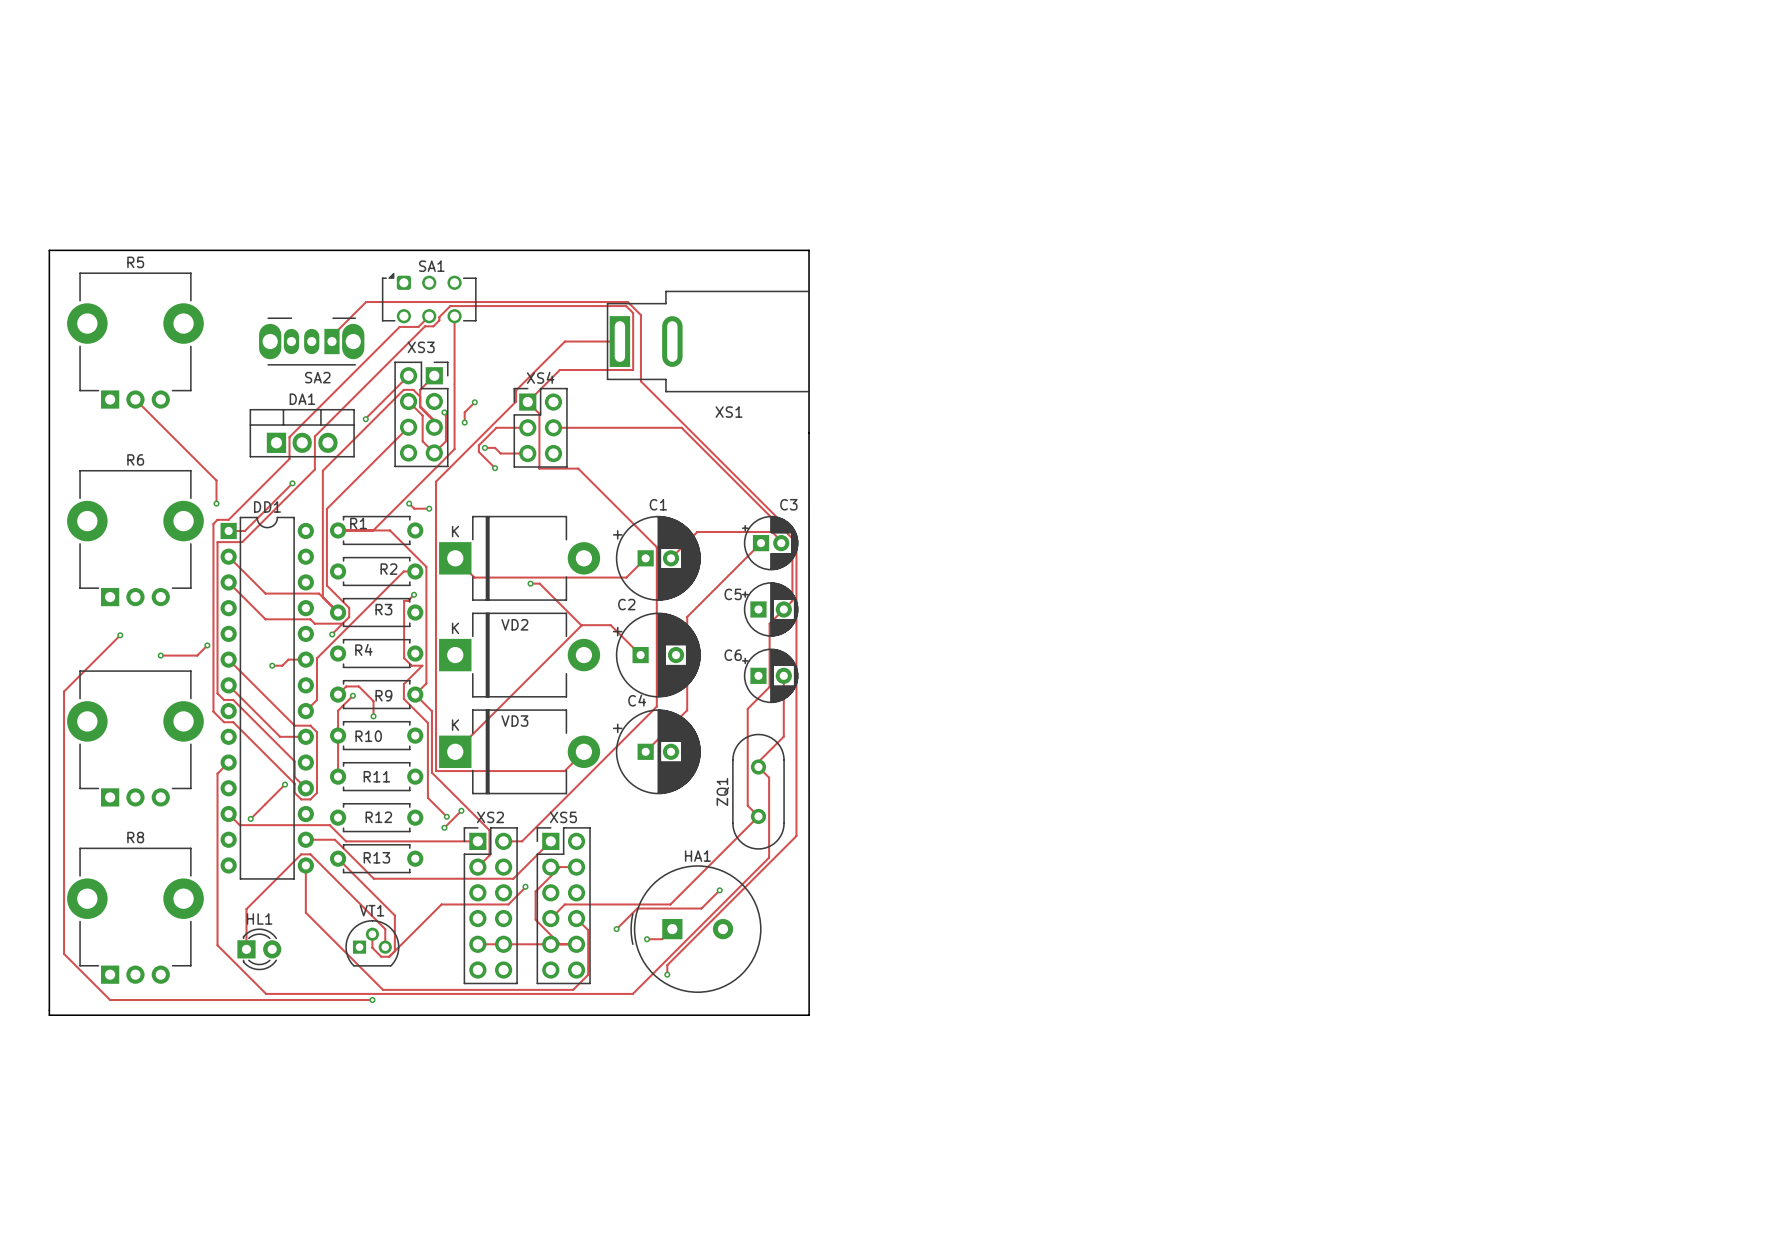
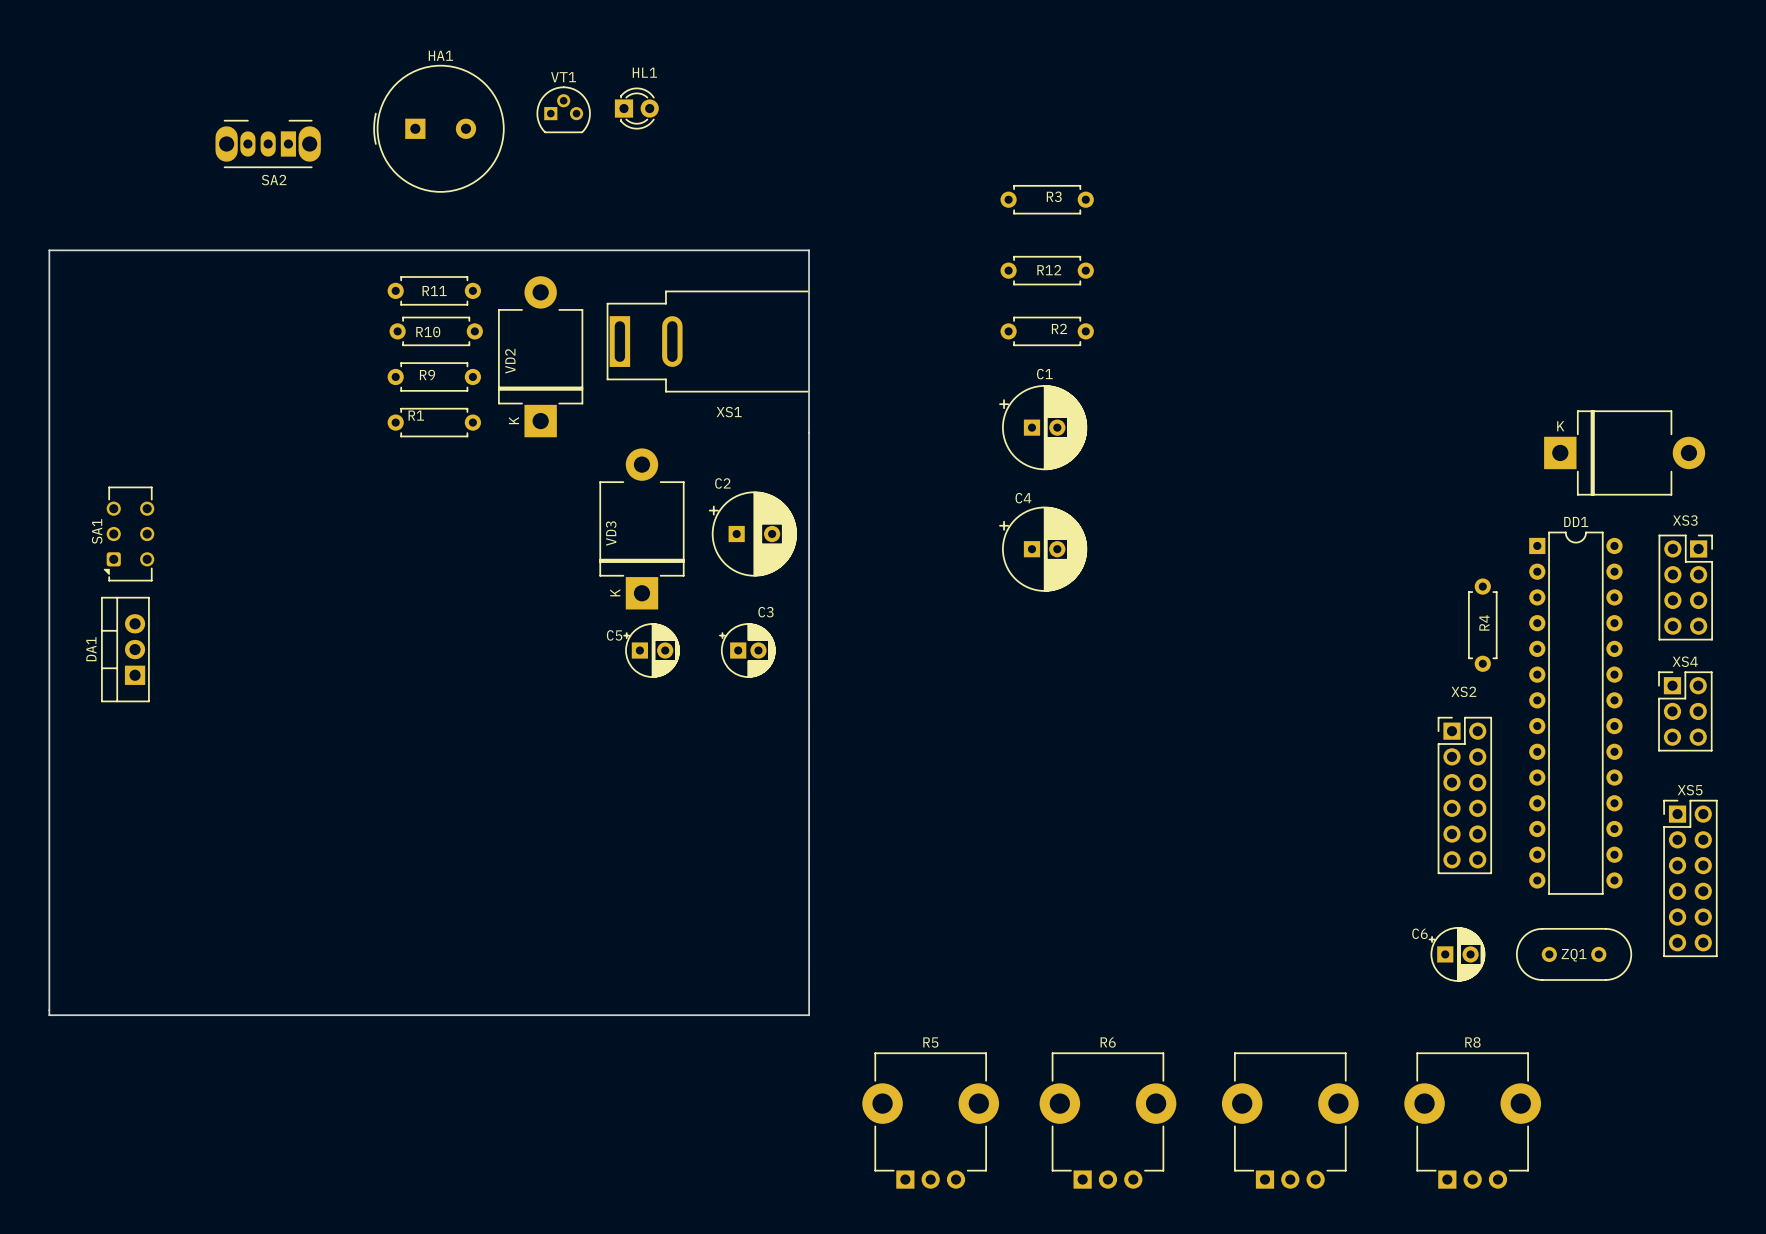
SA1 rotation: 0° (429, 298) -> 90° counterclockwise (128, 534)
SA1 position: (429, 298) -> (128, 534)
track: (429, 316) (418, 326) (399, 326) (289, 437) (289, 458) (228, 519) (217, 519) (213, 523) (213, 711) (224, 722) (233, 722) (294, 783) (294, 792) (301, 799) (310, 799) (316, 792) (316, 732) (310, 725) (294, 725) (228, 659) -> none
track: (454, 316) (454, 449) (373, 530) -> none
R5 position: (135, 340) -> (930, 1120)
SA2 position: (311, 341) -> (268, 143)
track: (331, 341) (331, 336) (366, 302) (627, 302) (640, 315) (640, 381) (796, 536) (796, 836) (667, 965) (667, 974) -> none
track: (619, 341) (564, 341) (516, 390) (516, 401) (436, 481) (436, 771) (564, 771) (583, 751) -> none
track: (408, 375) (365, 419) -> none
track: (434, 375) (420, 389) (420, 407) (434, 421) -> none
track: (420, 396) (413, 389) (403, 389) (322, 470) (322, 597) -> none
track: (135, 399) (216, 480) (216, 503) -> none
track: (408, 401) (422, 415) (422, 441) (434, 452) (445, 441) (444, 412) -> none
track: (474, 402) (464, 412) (464, 422) -> none
via: (474, 402) -> none
track: (420, 406) (434, 420) (434, 427) -> none
via: (444, 412) -> none
XS3 position: (421, 414) -> (1685, 587)
via: (365, 419) -> none
via: (464, 422) -> none
track: (408, 427) (326, 508) (326, 585) (349, 607) (349, 617) (332, 634) -> none
track: (527, 427) (496, 427) (478, 445) (478, 451) (495, 468) -> none
XS4 position: (540, 427) -> (1685, 711)
track: (553, 427) (681, 427) (792, 538) (792, 600) (769, 623) (769, 686) (747, 708) (747, 805) (758, 816) (670, 904) (564, 904) (550, 918) -> none
DA1 rotation: 0° (302, 433) -> 90° counterclockwise (125, 649)
DA1 position: (302, 433) -> (125, 649)
track: (484, 447) (495, 447) (500, 453) (527, 453) -> none
via: (484, 447) -> none
part: none -> (1624, 452)
via: (495, 468) -> none
track: (292, 483) (244, 530) (228, 530) -> none
via: (292, 483) -> none
track: (409, 502) (414, 508) (429, 508) -> none
via: (216, 503) -> none
via: (409, 503) -> none
via: (429, 508) -> none
track: (338, 530) (389, 530) (426, 566) (426, 683) (415, 694) (431, 711) (431, 772) (489, 830) (489, 855) (477, 867) -> none
R1 position: (376, 530) -> (434, 422)
R6 position: (135, 538) -> (1107, 1120)
track: (761, 543) (687, 616) (687, 710) (645, 751) -> none
C3 position: (770, 543) -> (747, 650)
track: (781, 543) (772, 531) (697, 531) (670, 558) -> none
track: (228, 556) (265, 593) (319, 593) (338, 612) -> none
track: (455, 558) (474, 577) (626, 577) (645, 558) -> none
part: (519, 558) -> none
C1 position: (656, 558) -> (1043, 427)
R2 position: (376, 571) -> (1047, 331)
track: (415, 571) (403, 571) (316, 658) (316, 699) (305, 711) -> none
track: (228, 582) (265, 619) (310, 619) (314, 623) (342, 623) -> none
track: (530, 583) (539, 583) (581, 625) -> none
via: (530, 583) -> none
track: (414, 594) (407, 600) (404, 600) (404, 658) (411, 665) (422, 665) (403, 684) (403, 698) (427, 723) (427, 797) (446, 816) -> none
via: (414, 594) -> none
C5 position: (770, 609) -> (651, 650)
R3 position: (376, 612) -> (1047, 199)
via: (332, 634) -> none
track: (120, 635) (64, 691) (64, 953) (110, 1000) (372, 1000) -> none
via: (120, 635) -> none
track: (207, 645) (197, 655) (160, 655) -> none
via: (207, 645) -> none
R4 rotation: 0° (376, 653) -> 90° clockwise (1482, 625)
R4 position: (376, 653) -> (1482, 625)
via: (160, 655) -> none
VD2 rotation: 0° (519, 655) -> 90° counterclockwise (540, 356)
VD2 position: (519, 655) -> (540, 356)
track: (640, 655) (610, 625) (581, 625) (455, 751) -> none
C2 position: (656, 655) -> (752, 534)
track: (305, 659) (288, 659) (282, 665) (272, 665) -> none
via: (272, 665) -> none
C6 position: (770, 675) -> (1456, 954)
track: (783, 675) (783, 736) (758, 761) (758, 767) (769, 777) (769, 857) (632, 993) (266, 993) (217, 945) (217, 773) (228, 762) -> none
track: (228, 685) (280, 736) (305, 736) -> none
track: (338, 694) (346, 686) (358, 686) (373, 701) (373, 716) -> none
R9 position: (376, 694) -> (434, 376)
track: (352, 695) (338, 710) (338, 776) -> none
via: (352, 695) -> none
R9 name position: R9 (383, 695) -> R9 (427, 375)
DD1 position: (267, 698) -> (1575, 713)
via: (373, 716) -> none
R10 position: (376, 735) -> (436, 331)
part: (135, 738) -> none
VD3 rotation: 0° (519, 751) -> 90° counterclockwise (641, 528)
VD3 position: (519, 751) -> (641, 528)
C4 position: (656, 751) -> (1043, 549)
R11 position: (376, 776) -> (434, 290)
track: (285, 784) (250, 818) -> none
via: (285, 784) -> none
track: (305, 788) (294, 777) (294, 761) (233, 699) (224, 699) (217, 693) (217, 542) (242, 542) (314, 469) (314, 436) (425, 326) (433, 326) (450, 306) (626, 306) (633, 313) (633, 370) (559, 370) (527, 402) (539, 413) (539, 468) (578, 468) (656, 547) (656, 706) (522, 841) (503, 841) -> none
ZQ1 name position: ZQ1 (722, 791) -> ZQ1 (1574, 955)
ZQ1 rotation: 0° (758, 791) -> 90° clockwise (1574, 954)
ZQ1 position: (758, 791) -> (1574, 954)
track: (461, 810) (444, 827) -> none
via: (461, 810) -> none
track: (228, 814) (239, 825) (329, 825) (346, 841) (477, 841) -> none
via: (446, 816) -> none
R12 position: (376, 817) -> (1047, 270)
XS2 name position: XS2 (490, 817) -> XS2 (1463, 691)
via: (250, 818) -> none
via: (444, 827) -> none
track: (305, 839) (334, 839) (373, 878) (513, 878) (550, 841) -> none
track: (338, 858) (394, 915) (394, 951) -> none
R13: (376, 858) -> none
track: (305, 865) (305, 912) (383, 989) (573, 989) (588, 974) (588, 930) (576, 918) -> none
track: (576, 867) (560, 867) (535, 891) (535, 919) (560, 944) -> none
track: (525, 886) (508, 904) (441, 904) (389, 956) (381, 956) (372, 947) (372, 934) -> none
via: (525, 886) -> none
track: (719, 890) (701, 908) (637, 908) (616, 929) -> none
via: (719, 890) -> none
XS2 position: (490, 905) -> (1464, 795)
XS5 position: (563, 905) -> (1690, 878)
R8 position: (135, 915) -> (1472, 1120)
HL1 name position: HL1 (259, 918) -> HL1 (644, 72)
via: (616, 929) -> none
track: (672, 929) (662, 939) (647, 939) -> none
HA1 position: (695, 929) -> (438, 128)
via: (647, 939) -> none
VT1 position: (372, 943) -> (563, 109)
track: (477, 944) (576, 944) -> none
track: (385, 947) (385, 929) (310, 854) (301, 854) (246, 909) (246, 949) -> none
HL1 position: (259, 949) -> (636, 108)
via: (667, 974) -> none
via: (372, 1000) -> none
part: none -> (1290, 1120)

